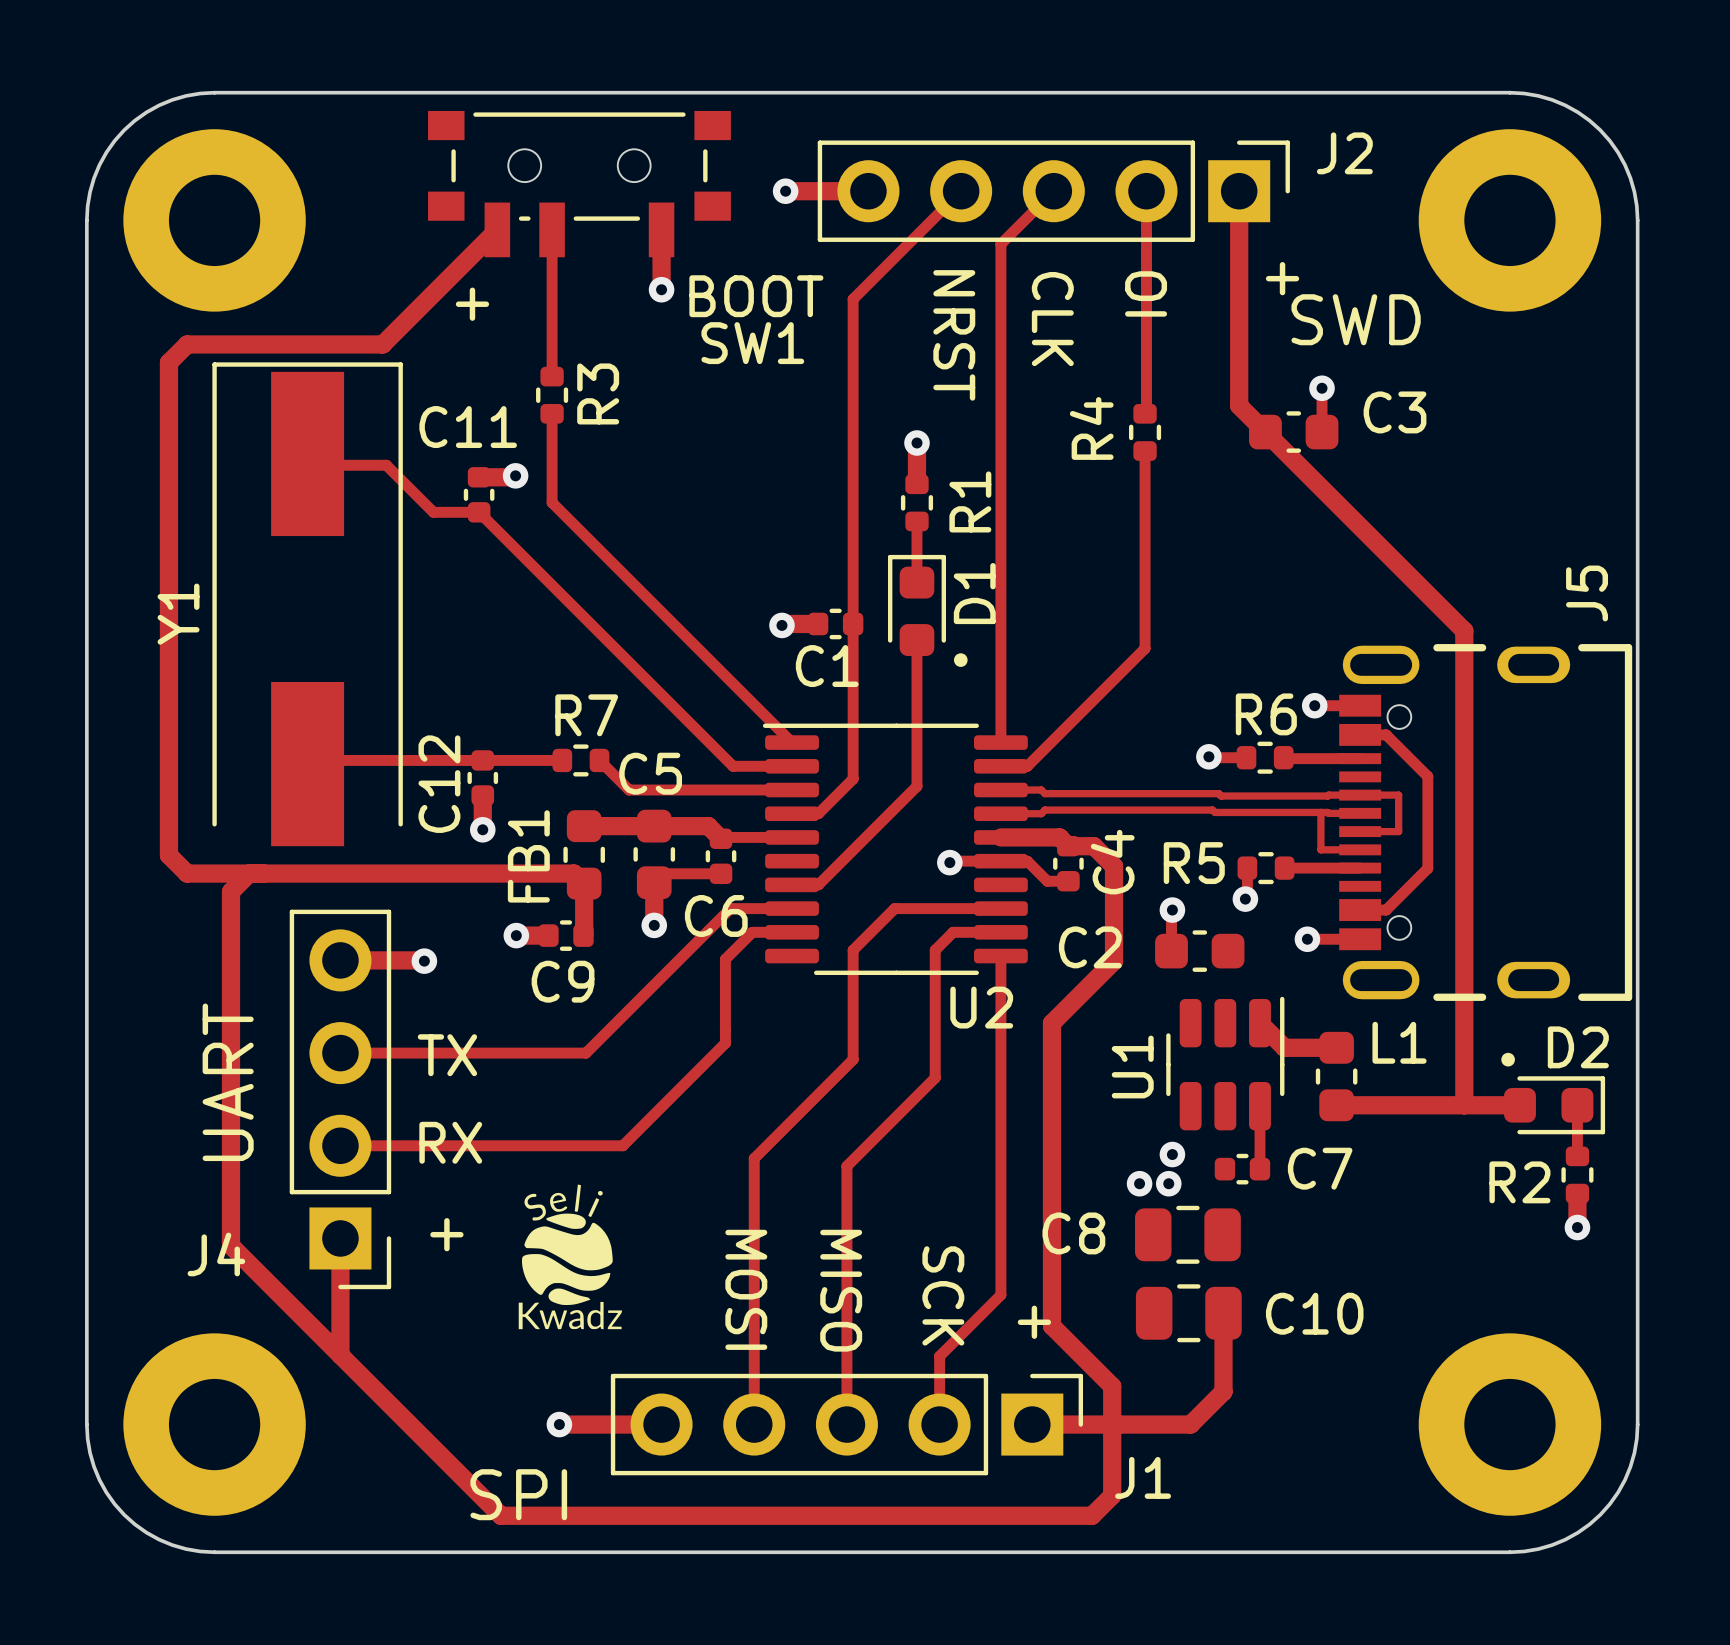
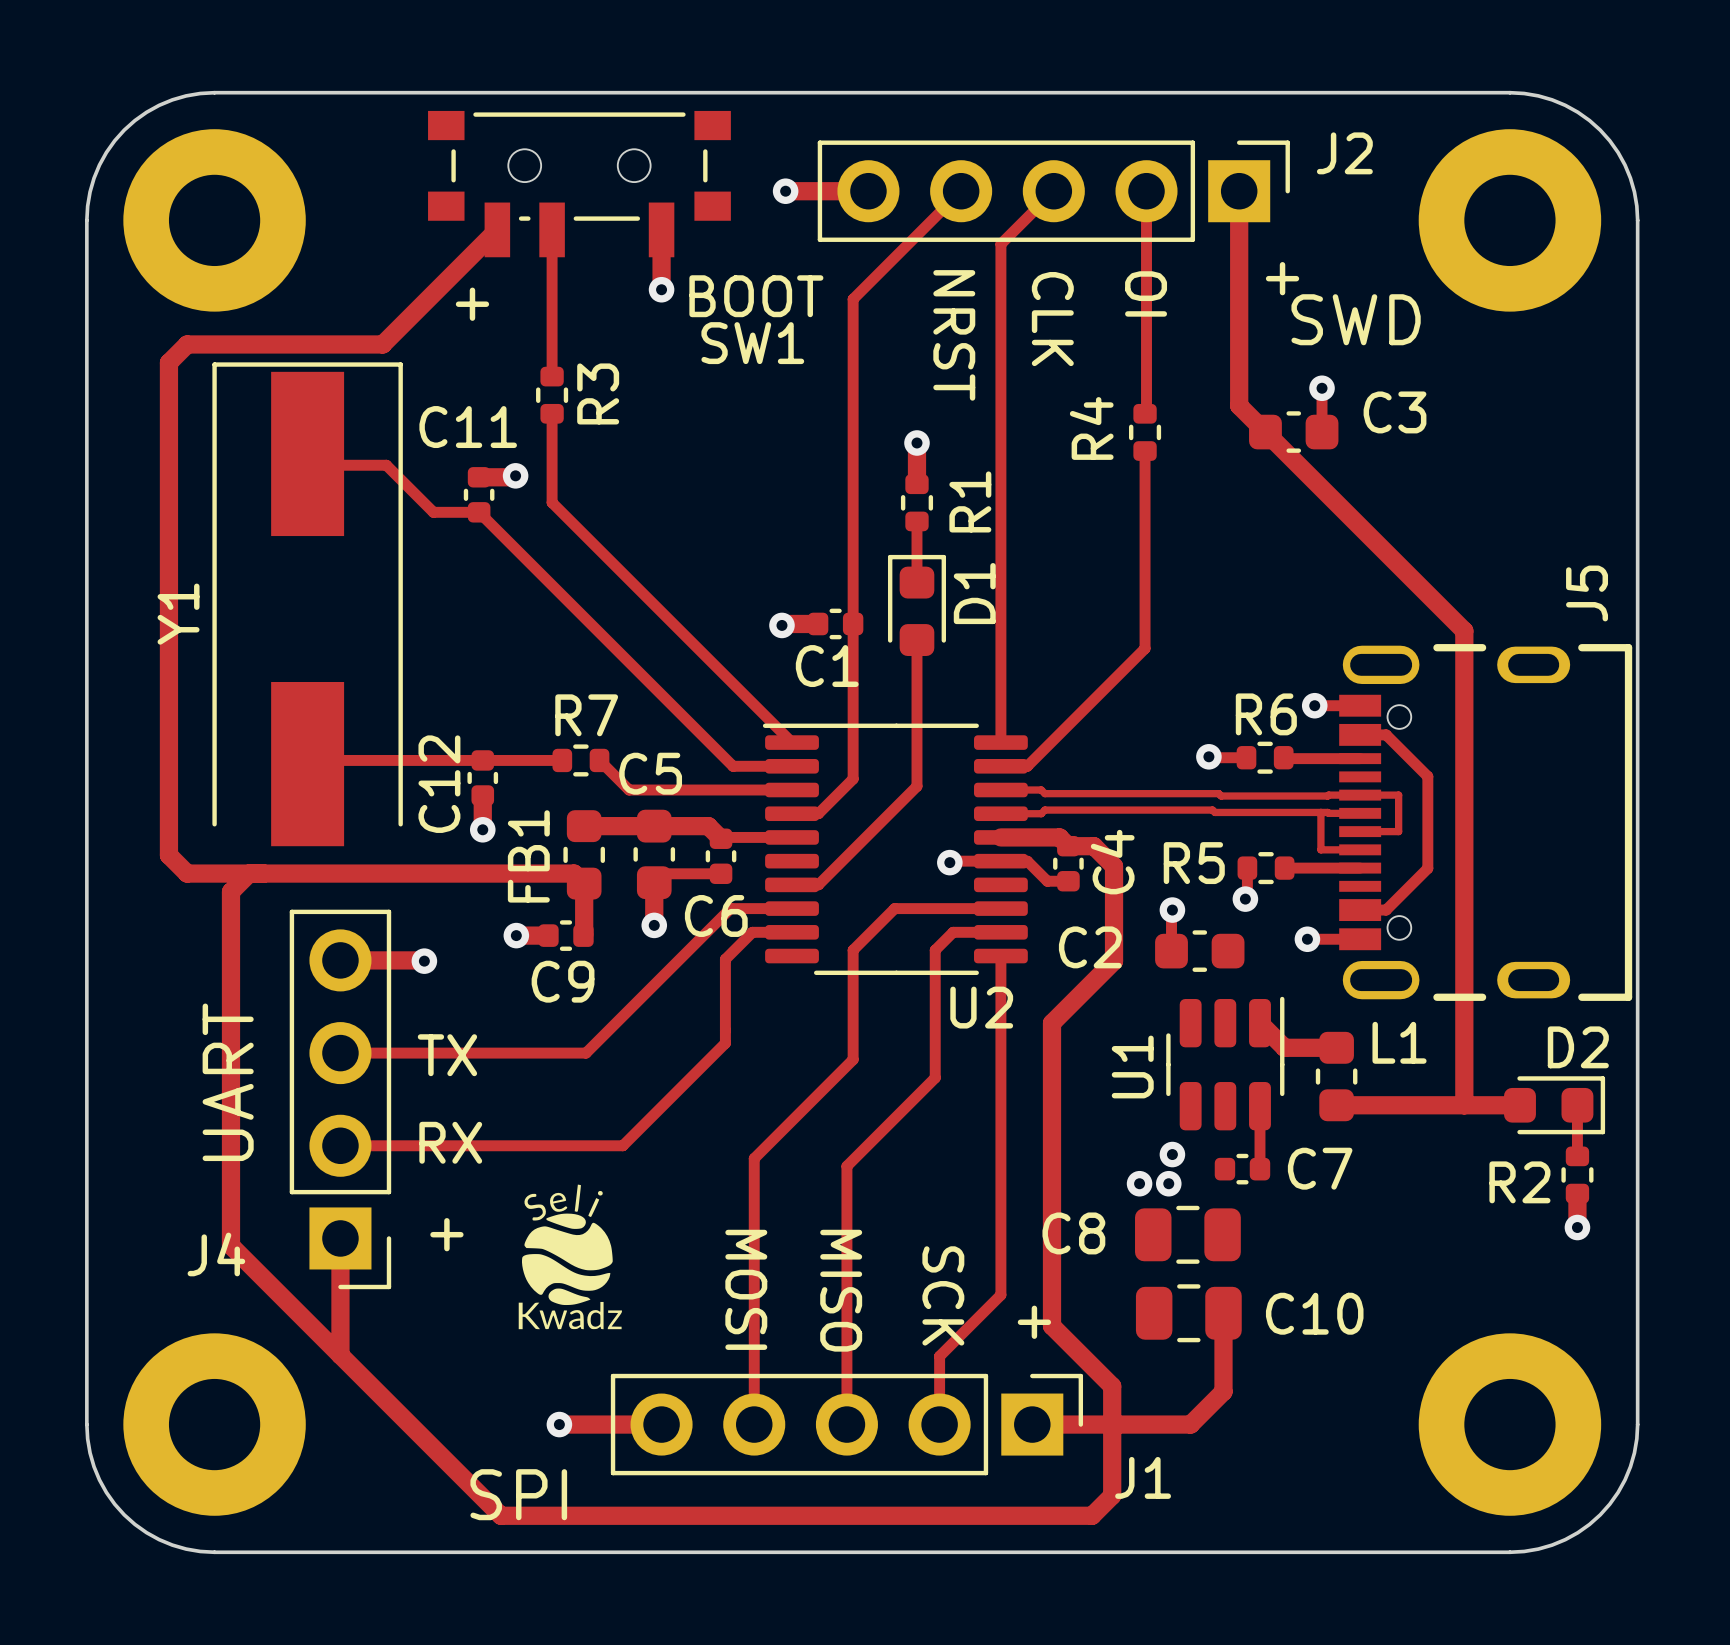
drawing: [953, 653, 968, 667] -> none
drawing: [1501, 1052, 1515, 1067] -> none

